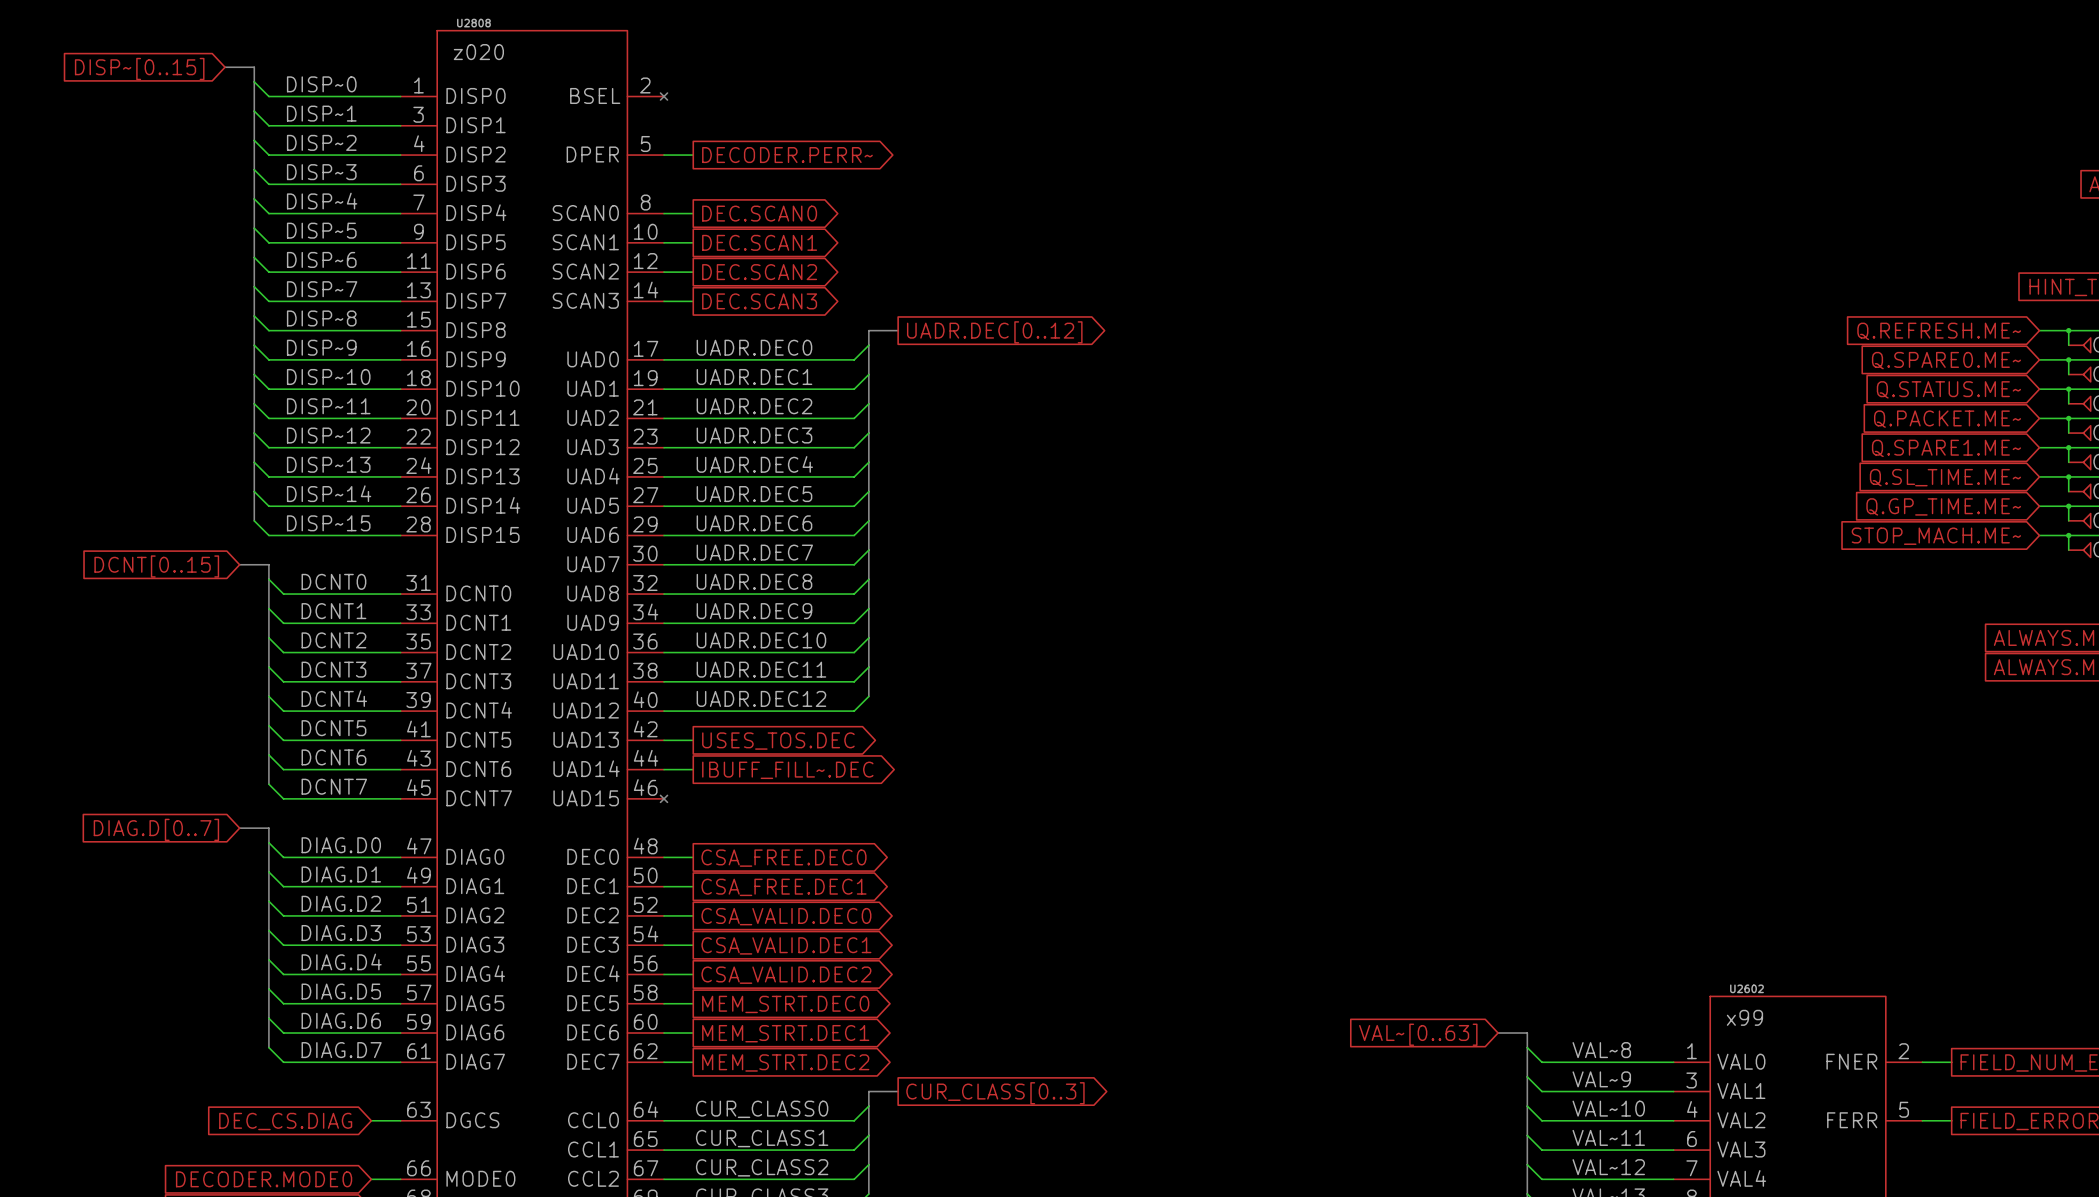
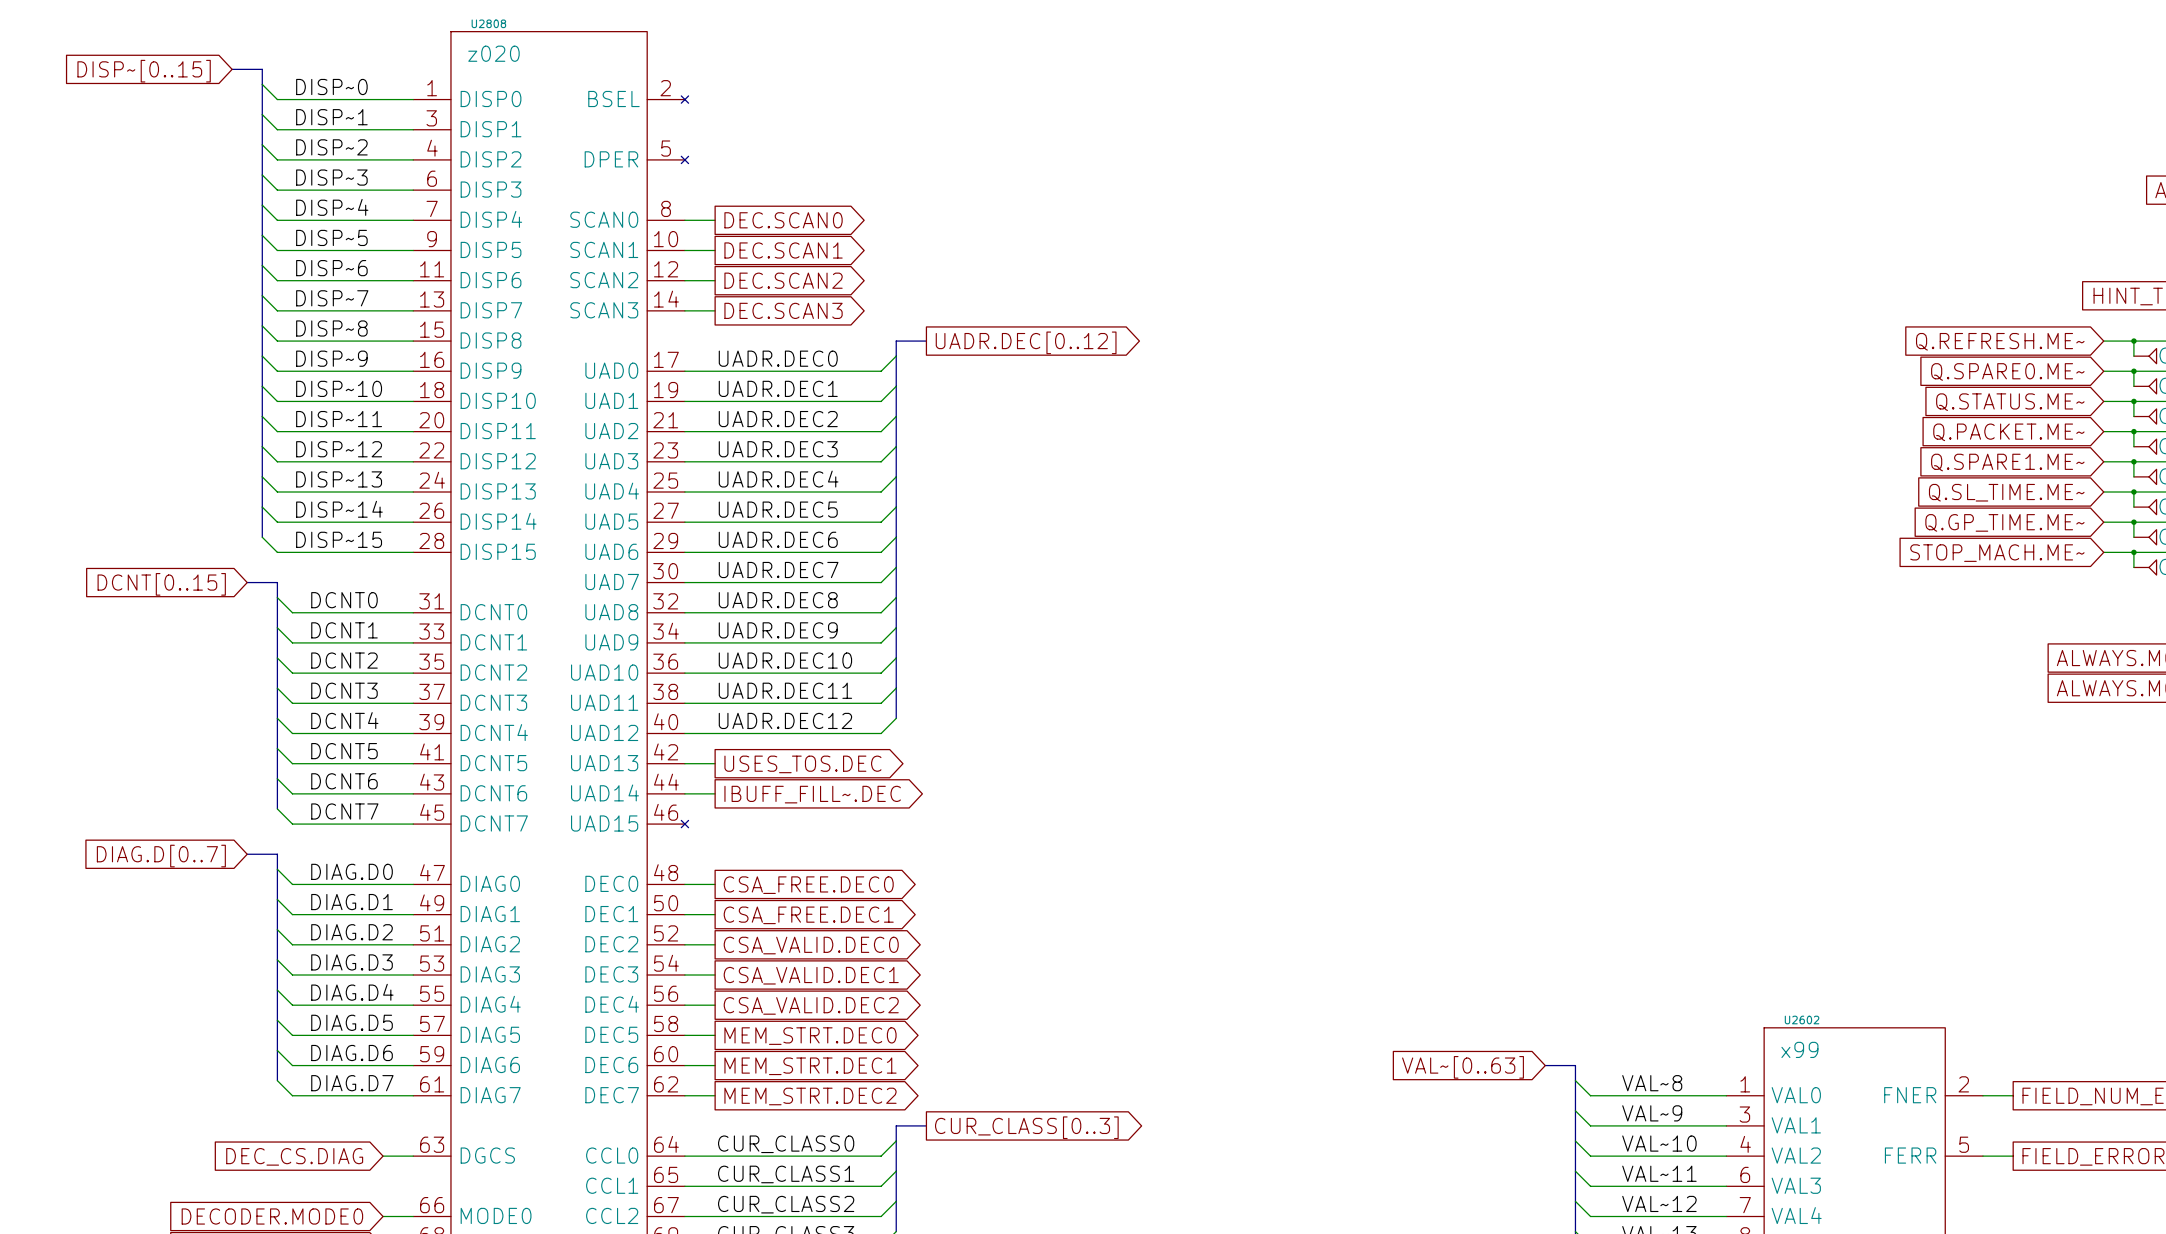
wire: (664, 155) (693, 155) -> none
no-connect mark: none -> (684, 159)
global label: DECODER.PERR~ (787, 155) -> none

